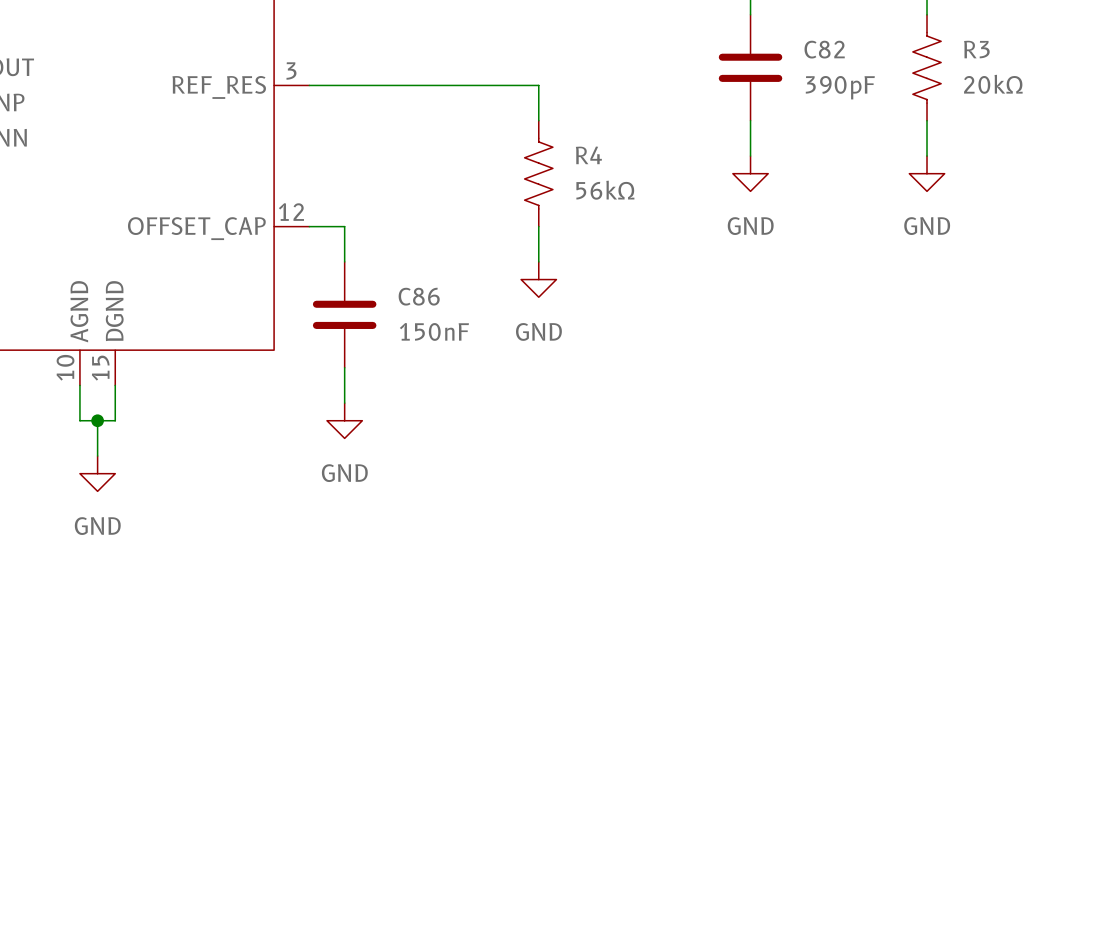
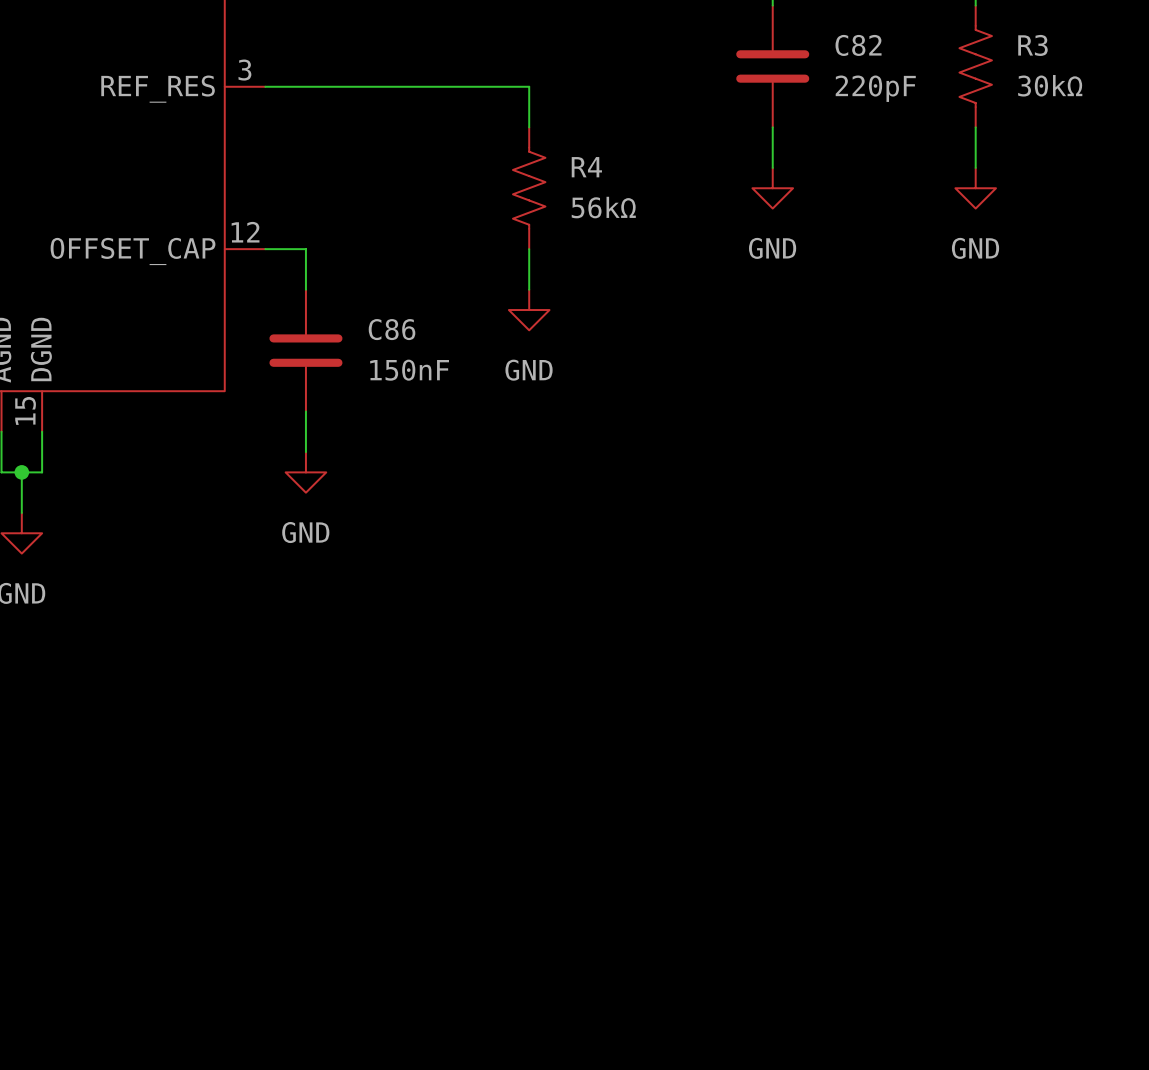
R3 value: 20kΩ (993, 84) -> 30kΩ (1050, 85)
C82 value: 390pF (840, 87) -> 220pF (875, 88)

